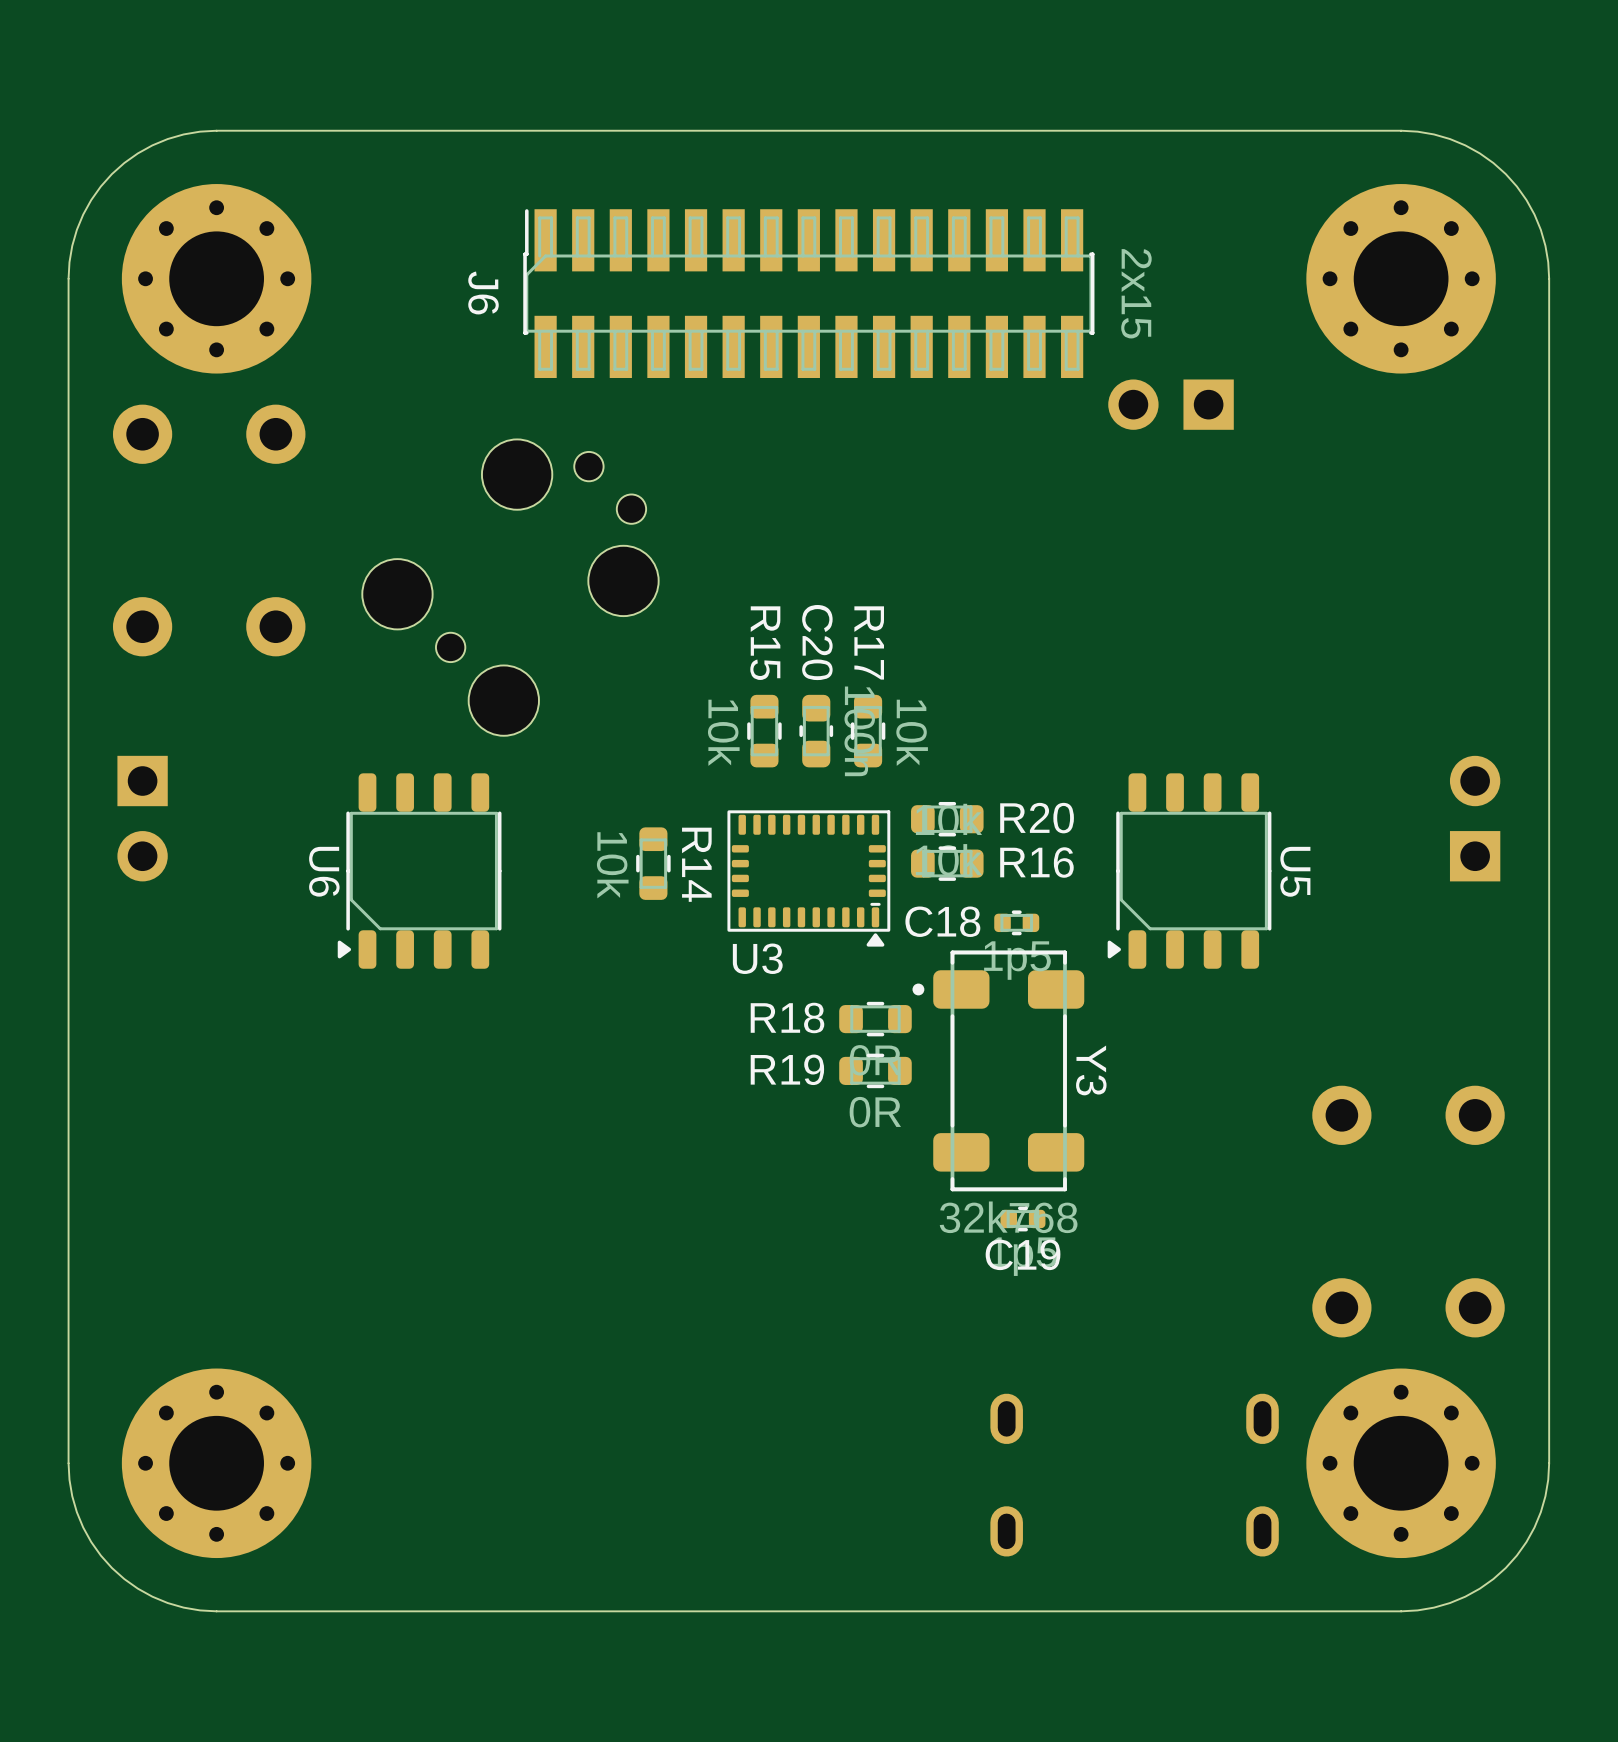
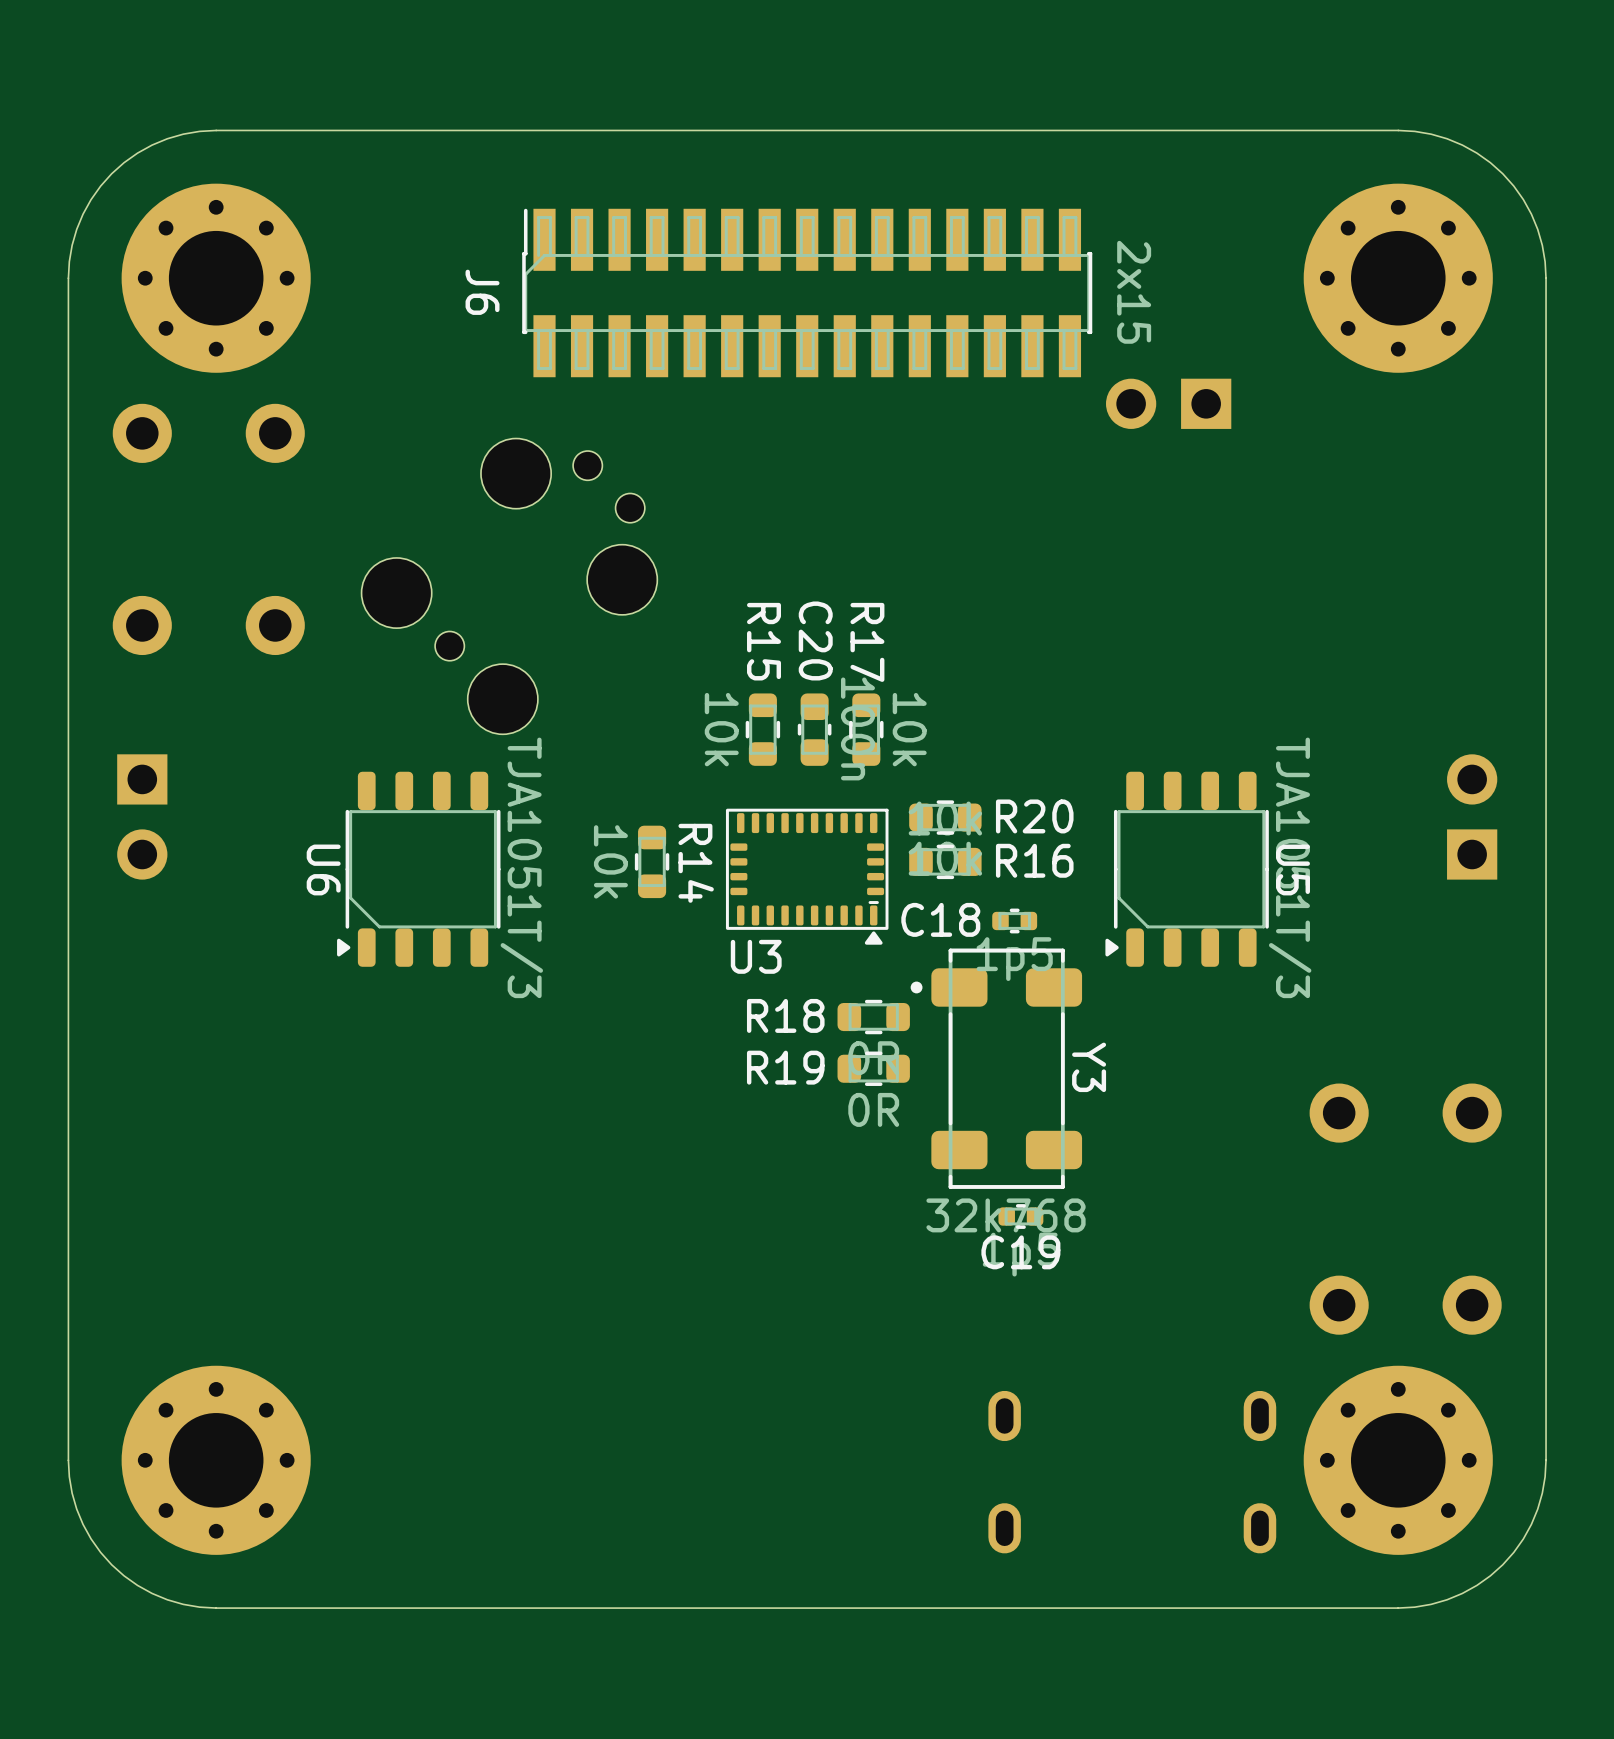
U6 value: none -> TJA1051T/3 (521, 867)
U5 value: none -> TJA1051T/3 (1290, 867)

